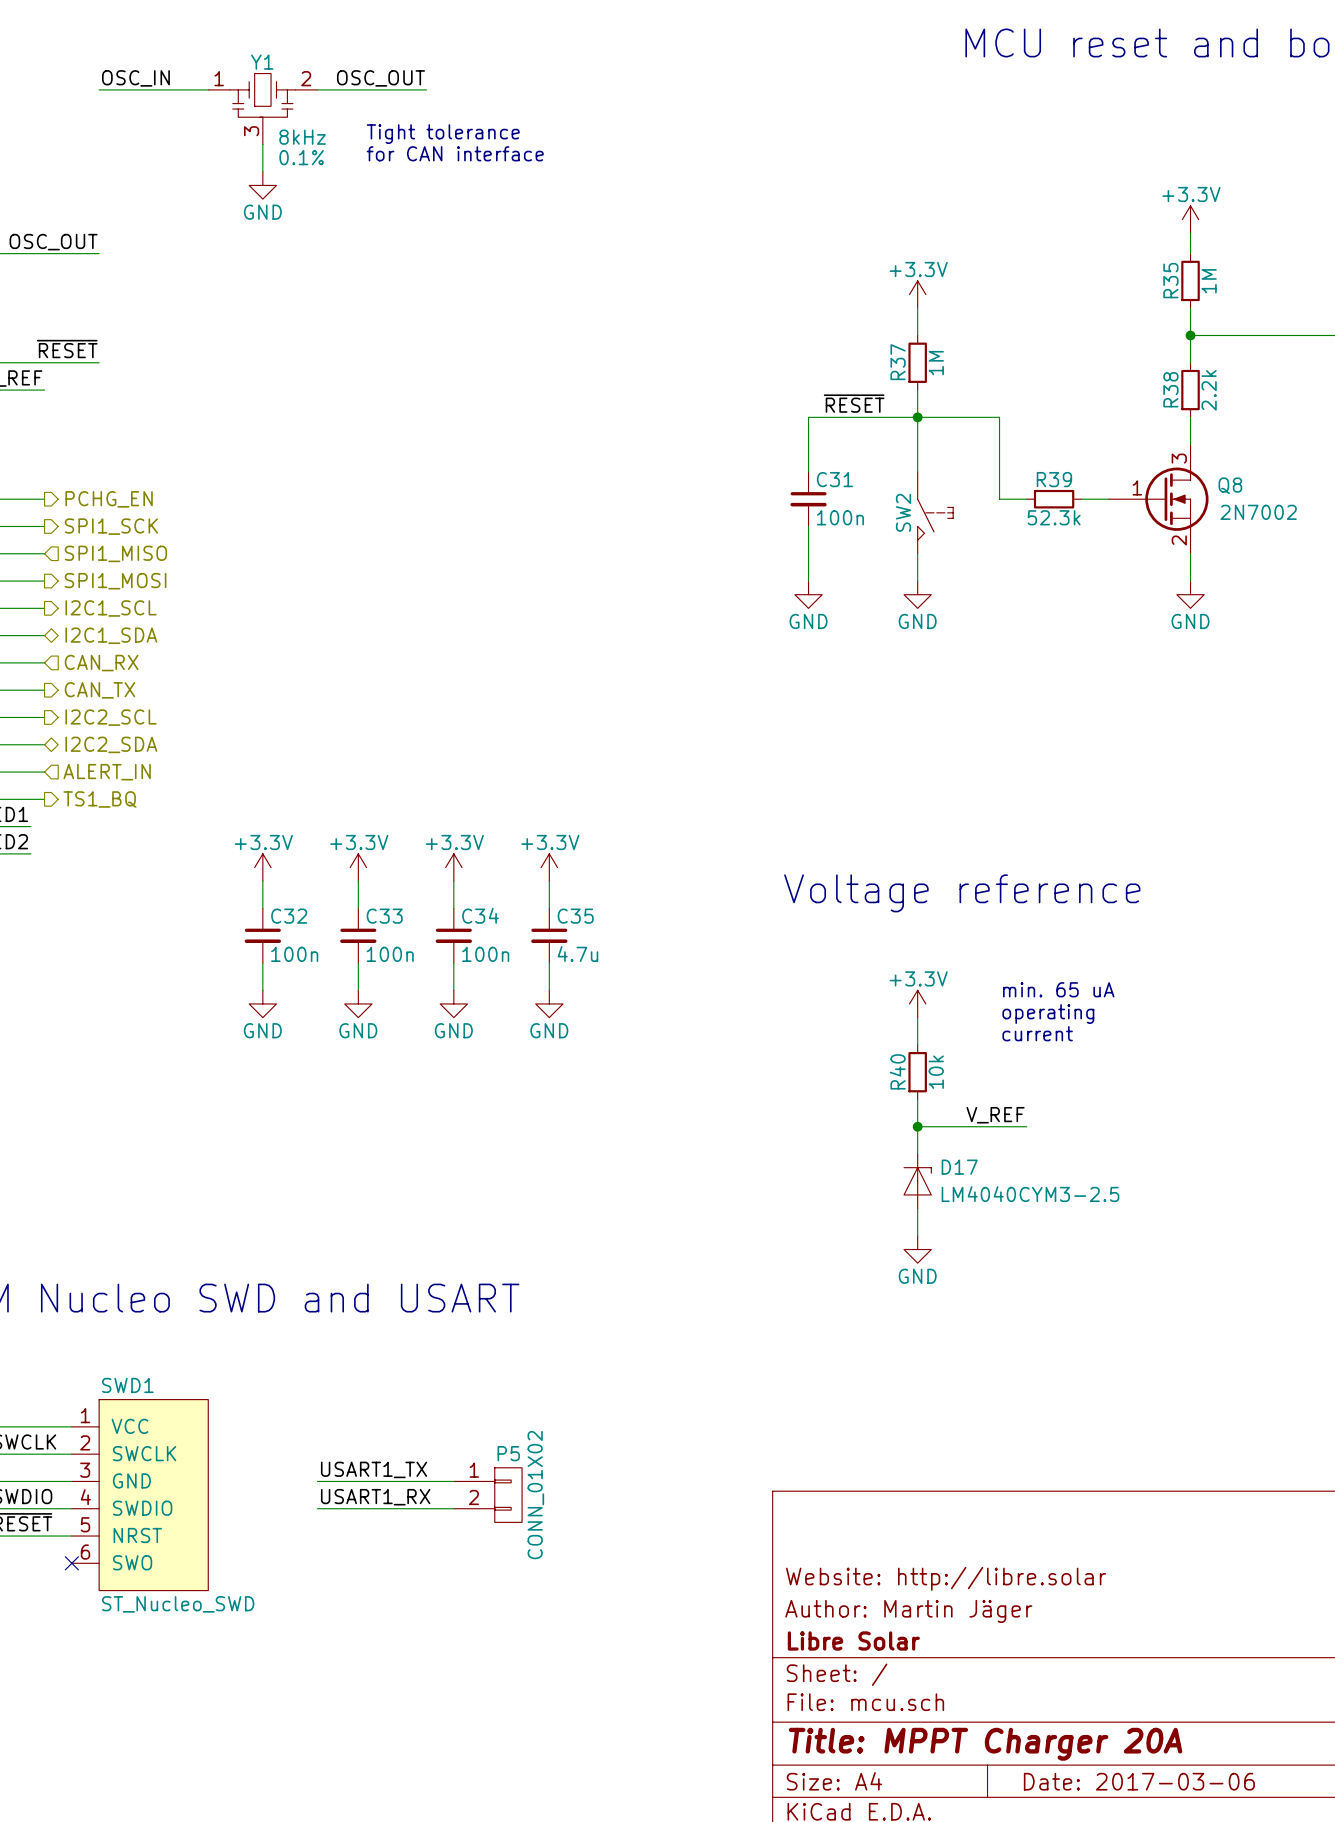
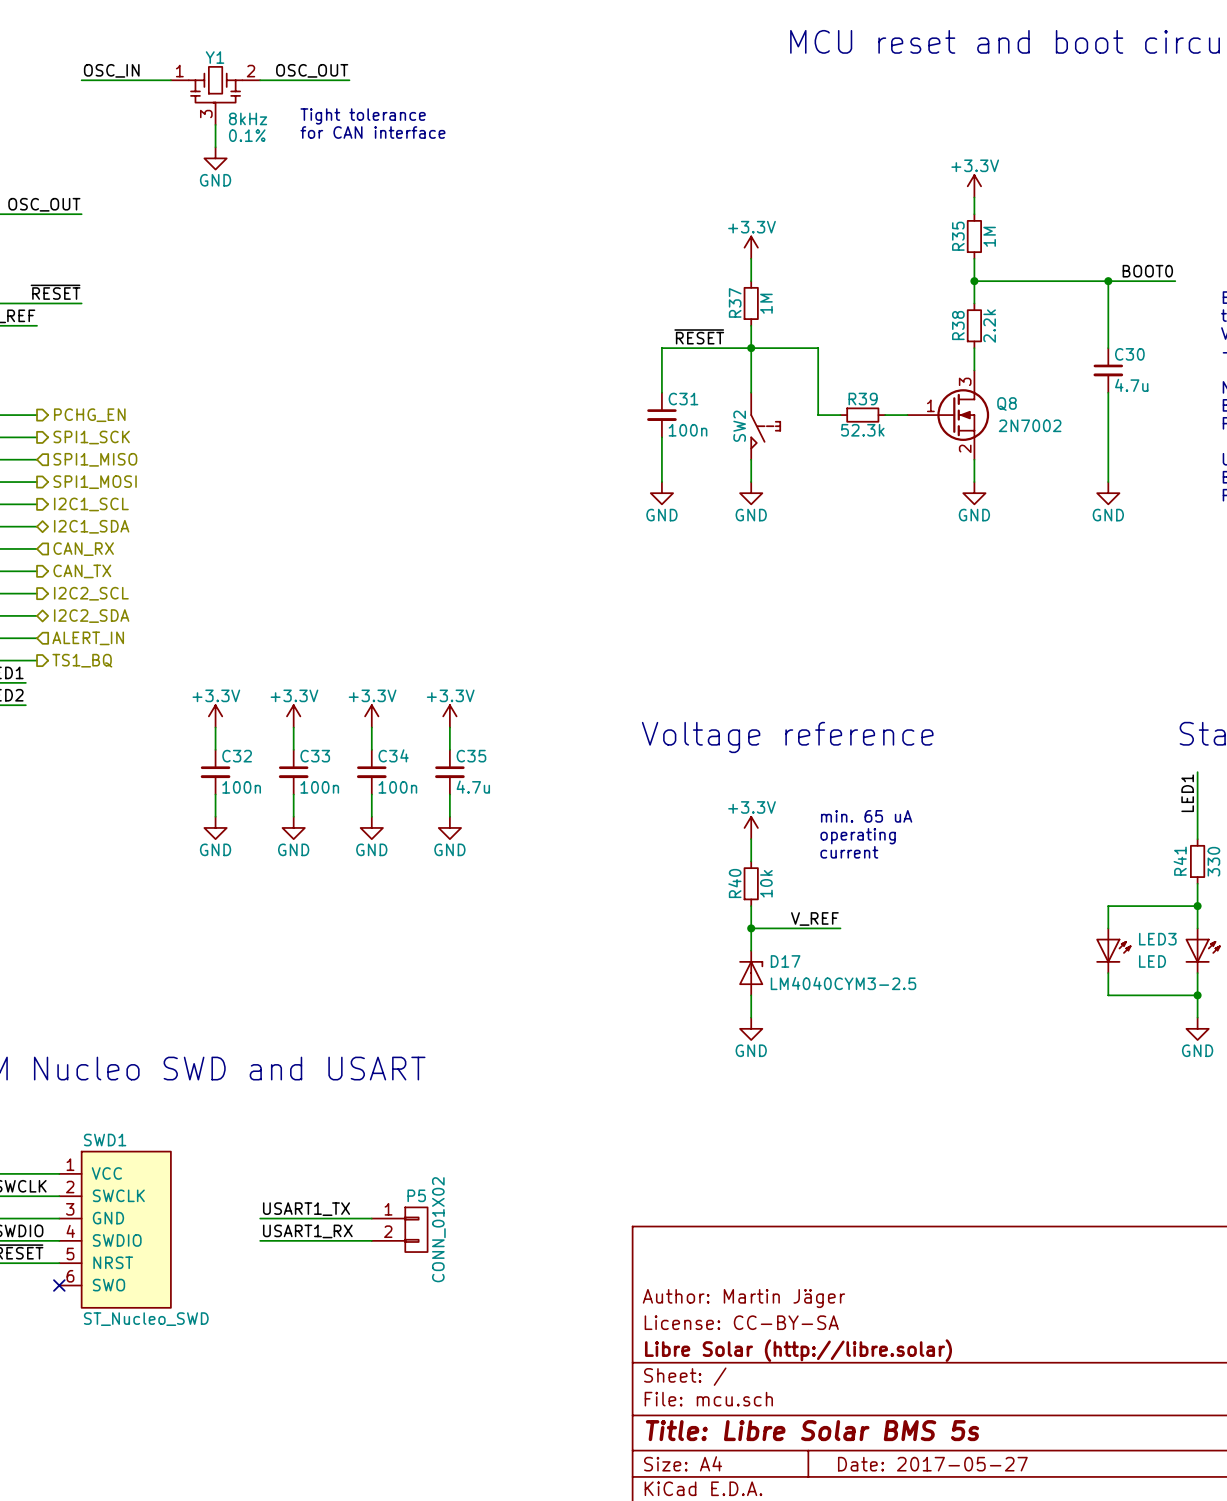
title block: Website: http://libre.solar (946, 1578) -> Author: Martin Jäger (743, 1298)
title block: Author: Martin Jäger (908, 1611) -> License: CC-BY-SA (741, 1322)
title block: Libre Solar (853, 1640) -> Libre Solar (http://libre.solar) (798, 1350)
title block: Title: MPPT Charger 20A (985, 1744) -> Title: Libre Solar BMS 5s (812, 1430)
title block: Date: 2017-03-06 (1139, 1781) -> Date: 2017-05-27 (932, 1464)

